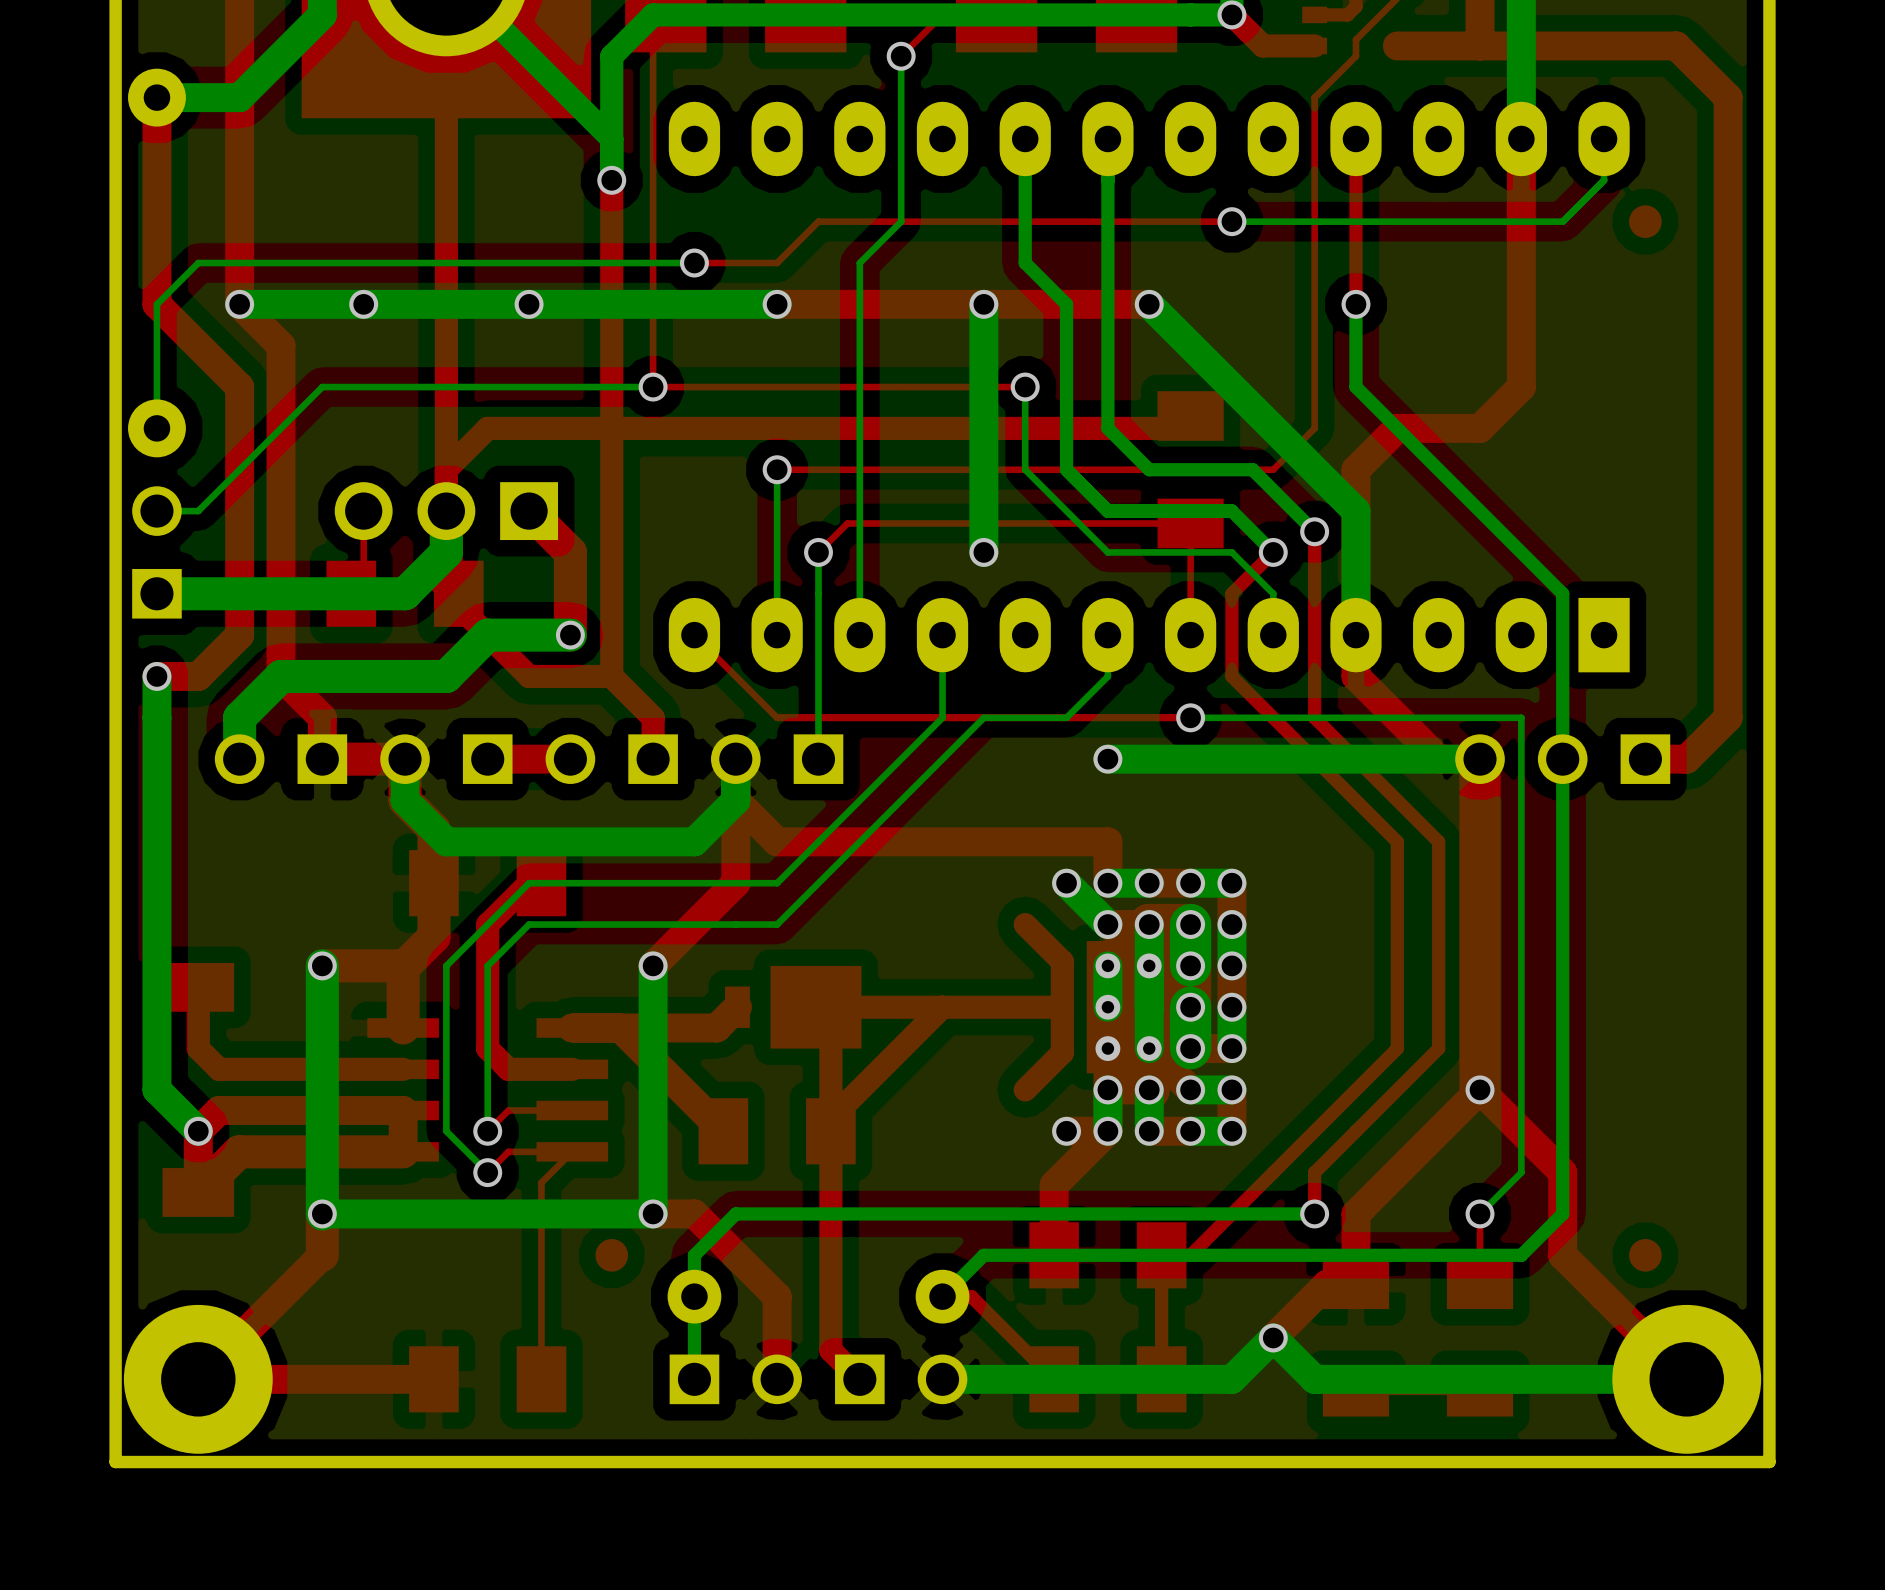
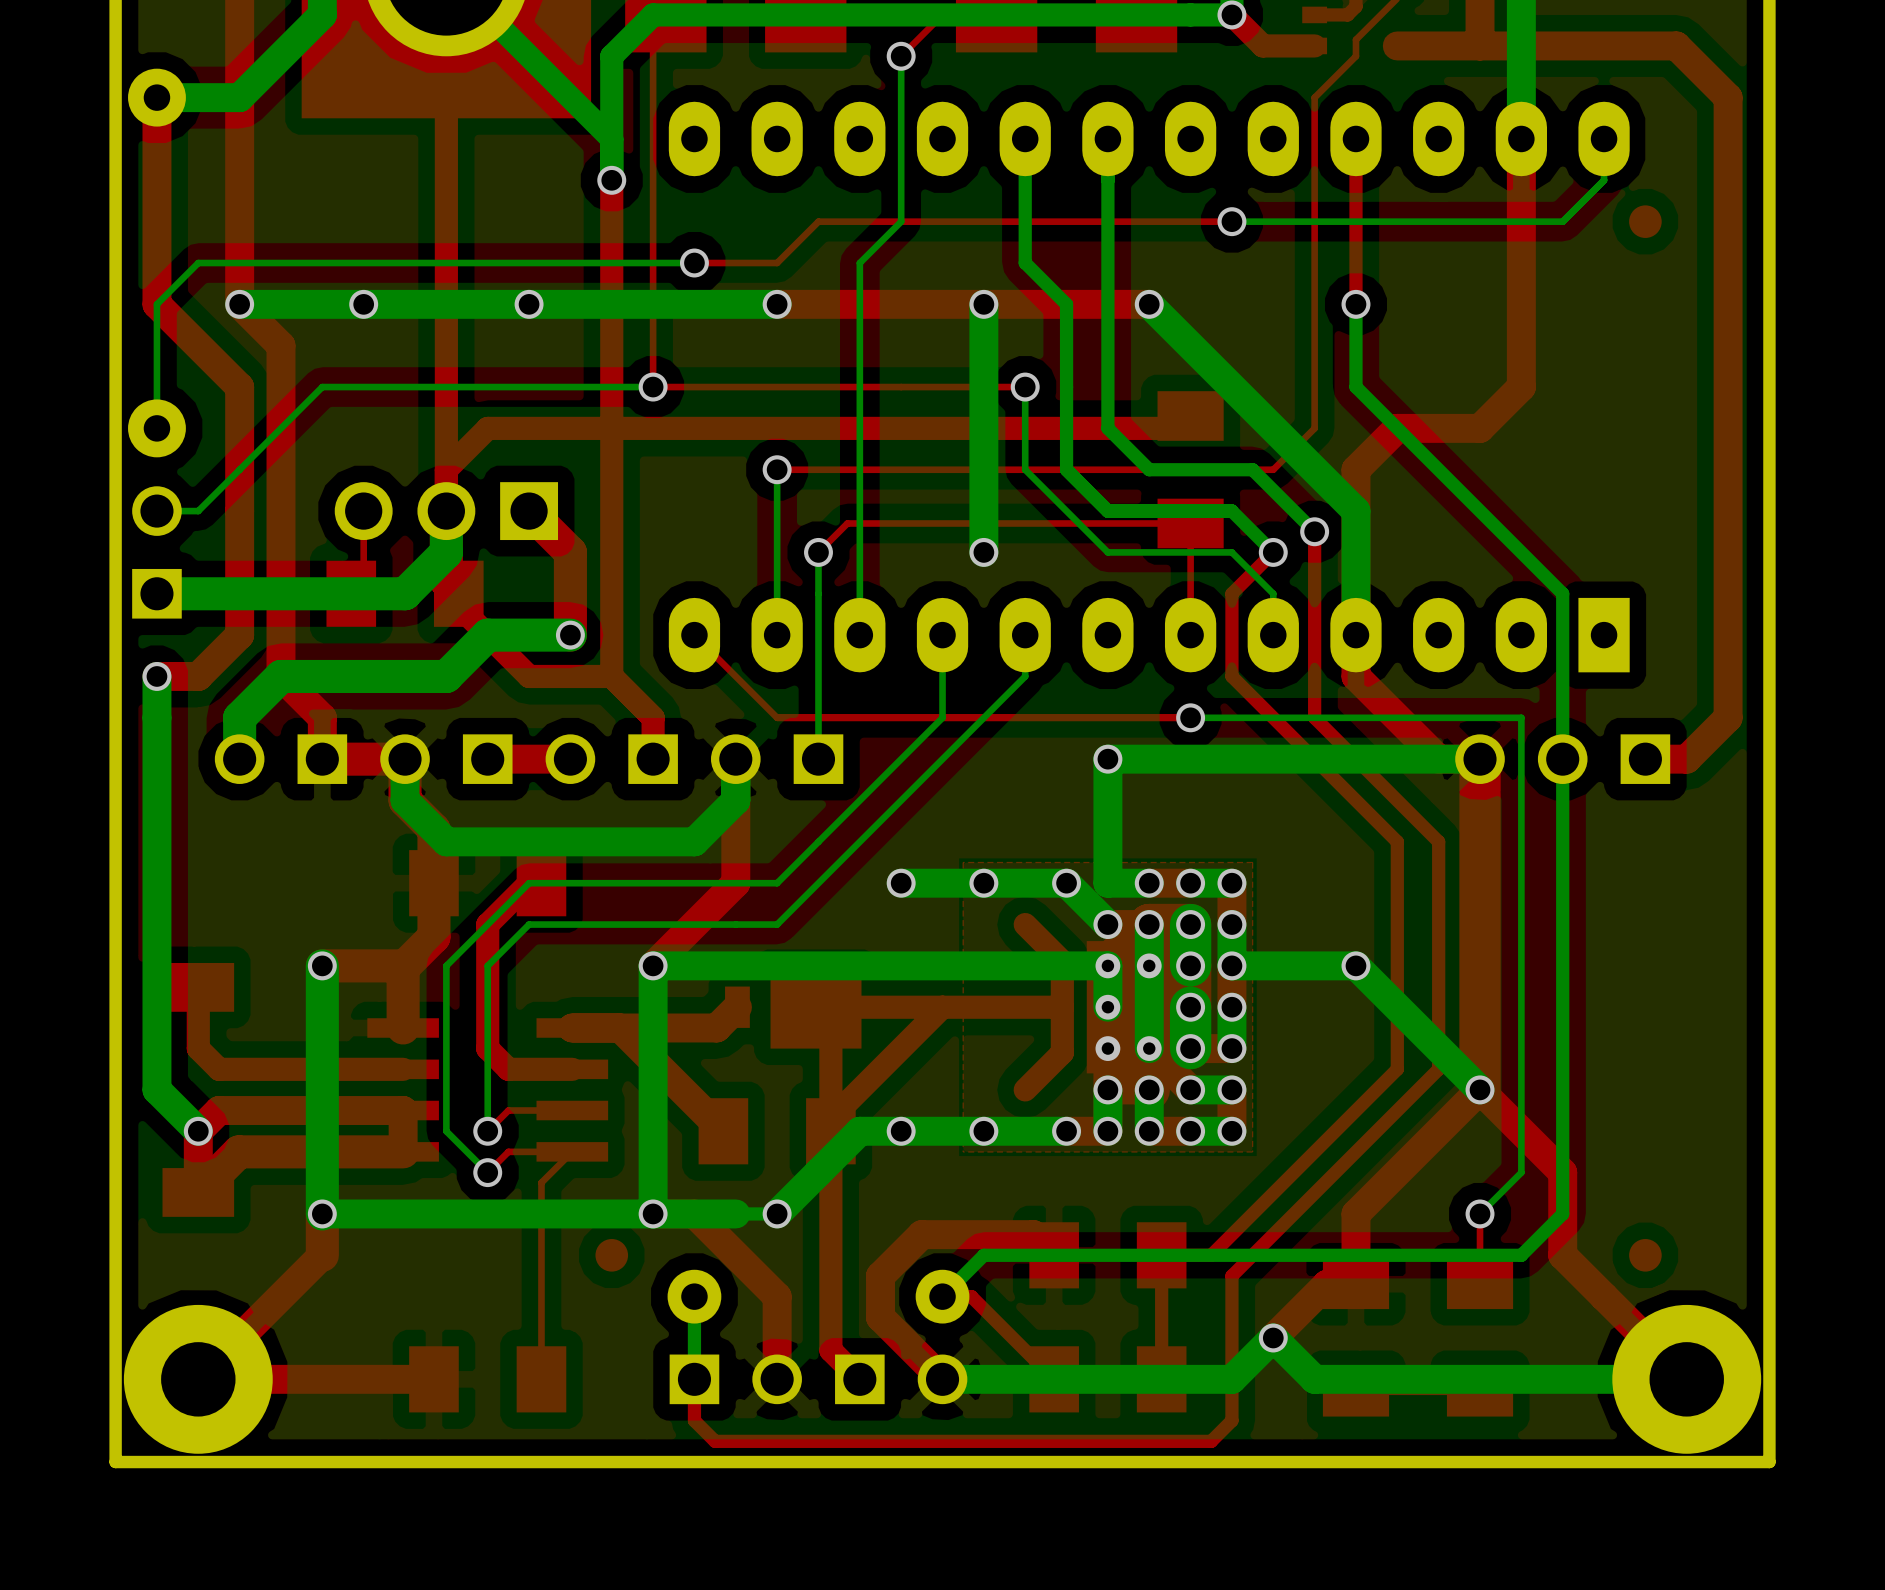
bottom track: (1107, 635) (1107, 676) (1066, 717) (983, 717) -> (1025, 635) (1025, 676) (983, 717)
bottom track: none -> (1107, 759) (1107, 883)
top track: (735, 800) (777, 841) (1107, 841) (1107, 883) -> none
top zone outline: none -> (1252, 862) (963, 862) (963, 1151) (1252, 1151) (1252, 862)
via: none -> (901, 883)
via: none -> (983, 883)
bottom track: none -> (1066, 883) (901, 883)
via: (1107, 883) -> none
bottom track: none -> (1107, 965) (653, 965)
bottom track: none -> (1231, 965) (1355, 965) (1480, 1089)
via: none -> (1355, 965)
top track: (1397, 1048) (1190, 1255) -> (1397, 1048) (1397, 1069) (1211, 1255) (1190, 1255)
top track: (1438, 1048) (1314, 1172) (1314, 1213) -> (1438, 1048) (1438, 1069) (1231, 1275) (1231, 1420) (1211, 1441) (715, 1441) (694, 1420) (694, 1379)
via: none -> (901, 1131)
via: none -> (983, 1131)
top track: (1107, 1131) (1054, 1185) (1054, 1255) -> (942, 1379) (880, 1317) (880, 1275) (921, 1234) (1033, 1234) (1054, 1255)
bottom track: (735, 1213) (694, 1255) (694, 1296) -> (735, 1213) (653, 1213)
via: none -> (777, 1213)
bottom track: (1314, 1213) (777, 1213) -> (1066, 1131) (859, 1131) (777, 1213)
via: (1314, 1213) -> none

